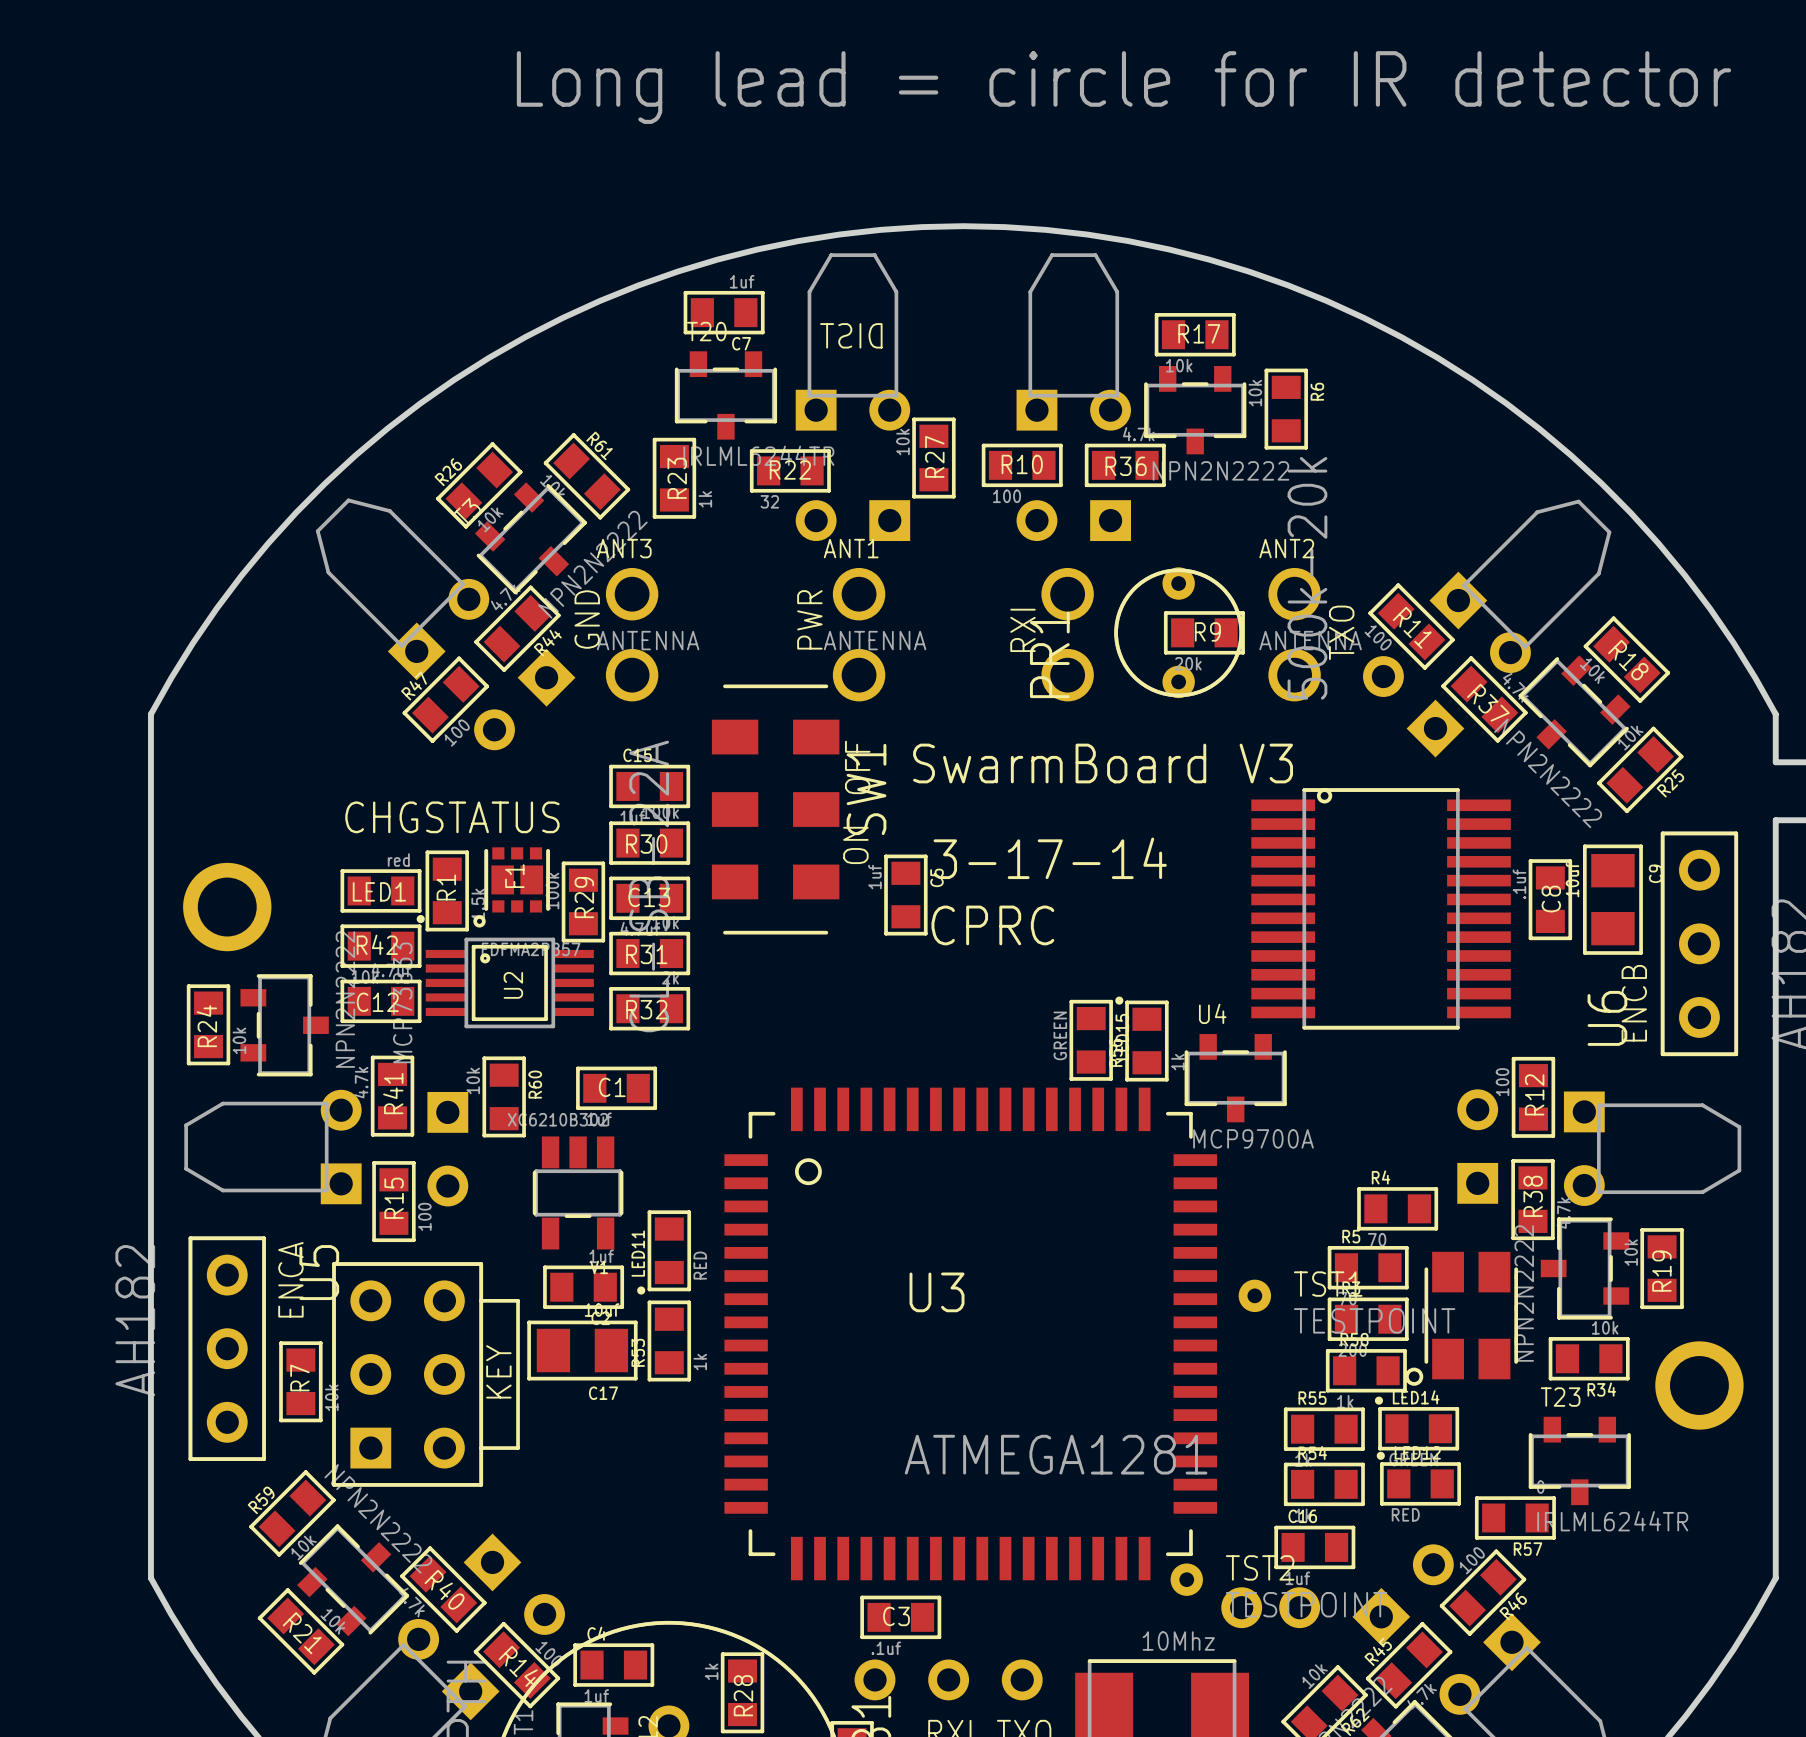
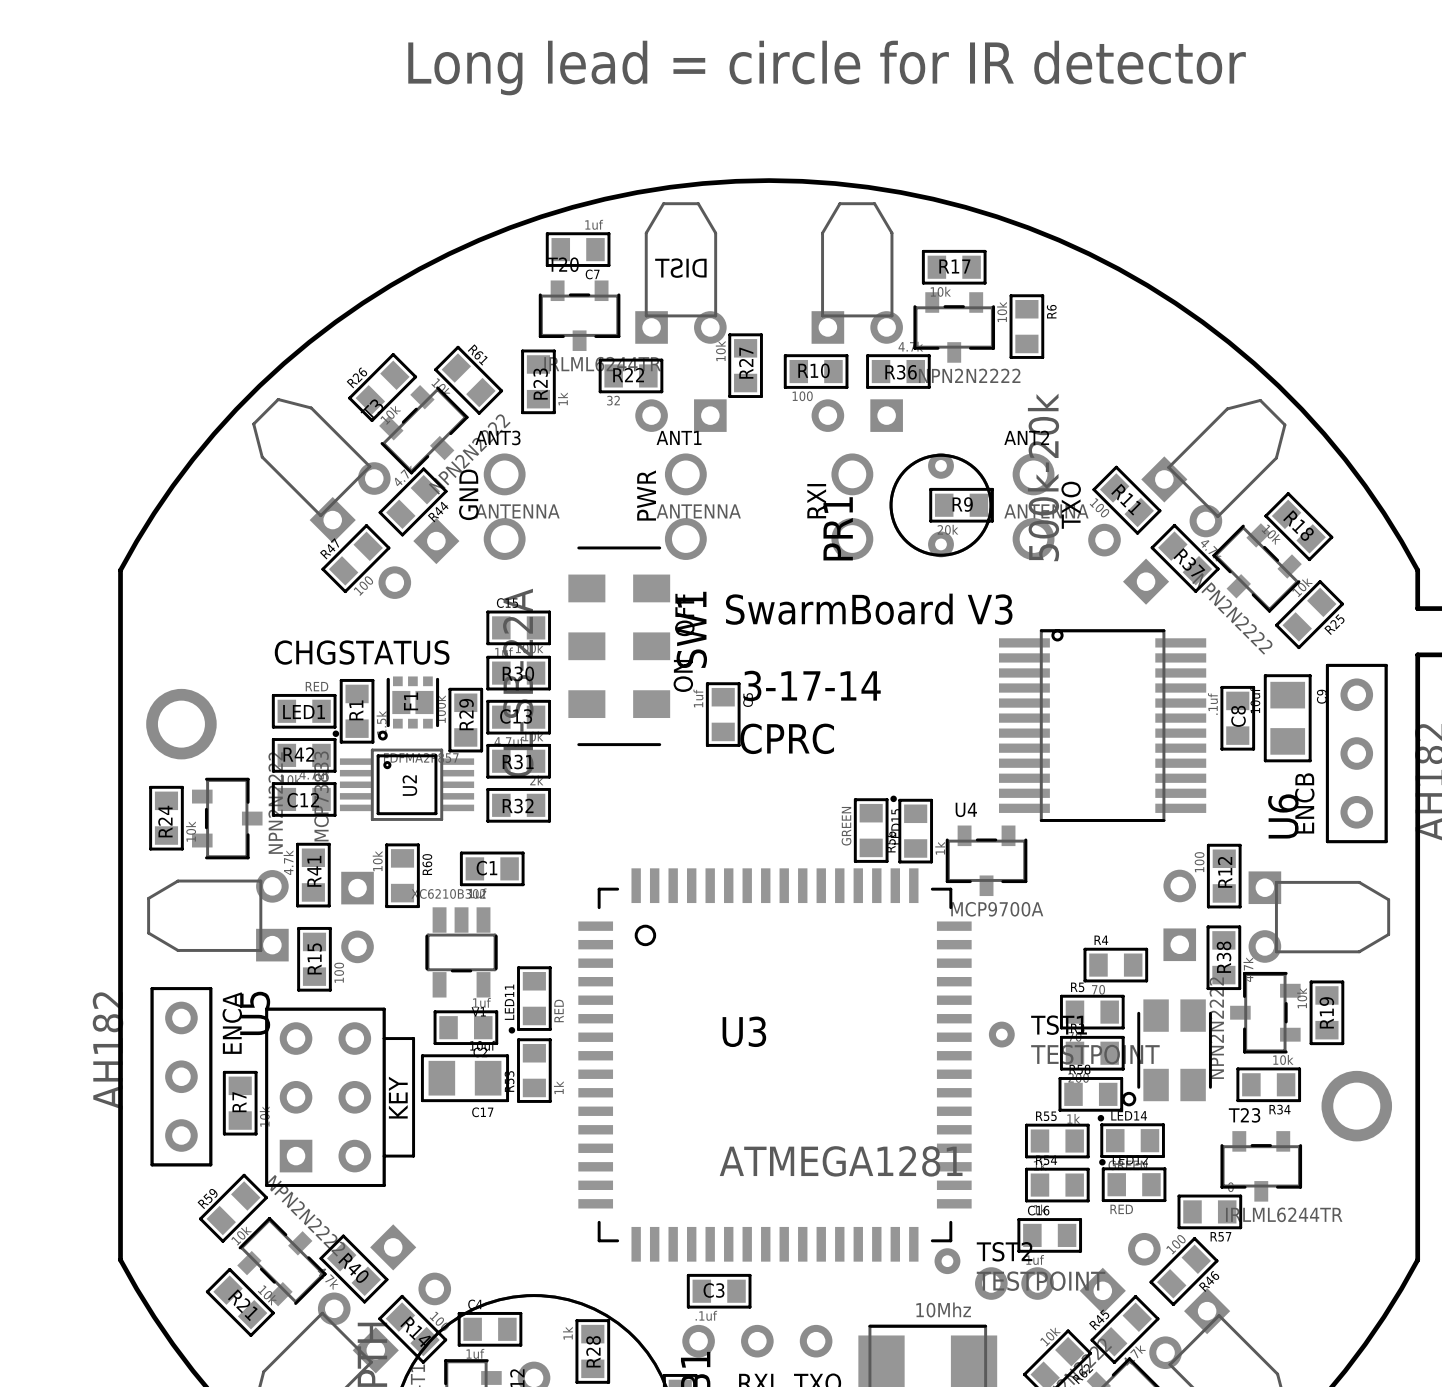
LED1 value: red (398, 860) -> RED (316, 686)

